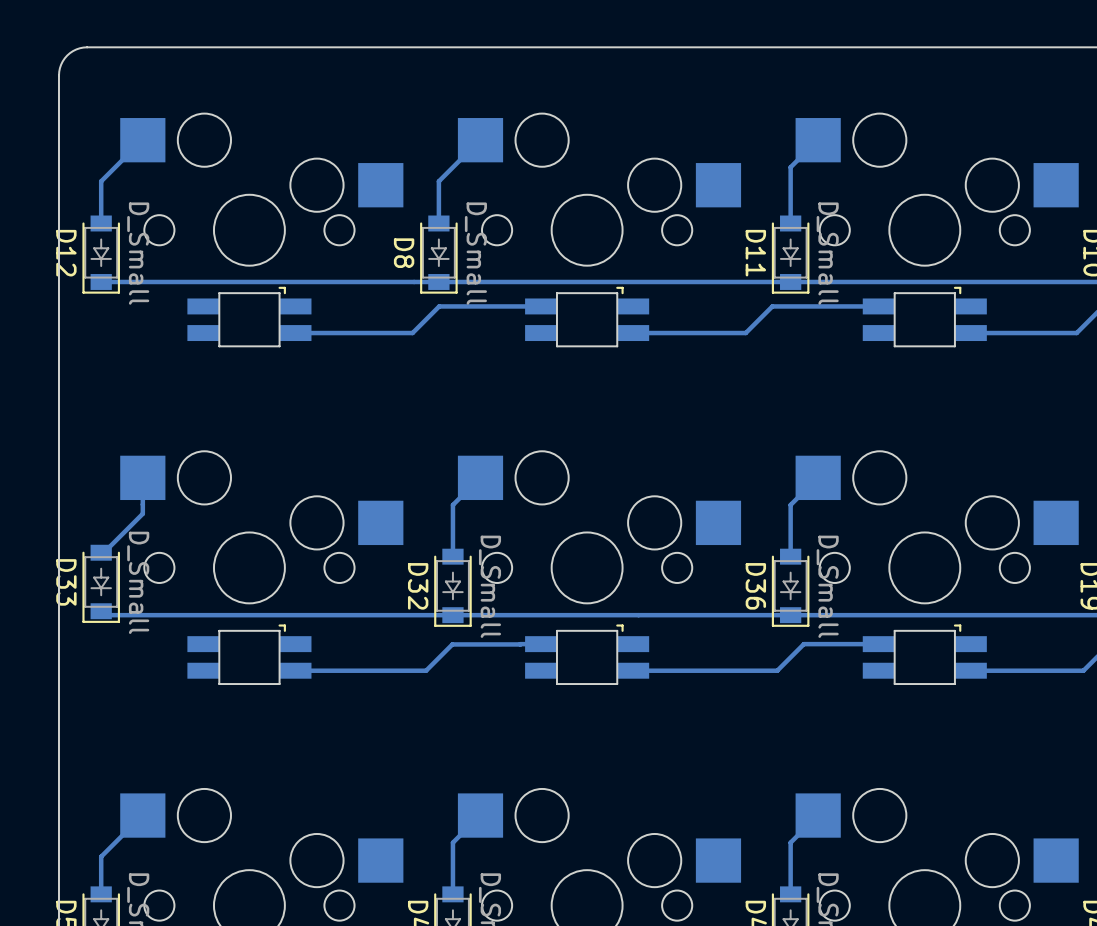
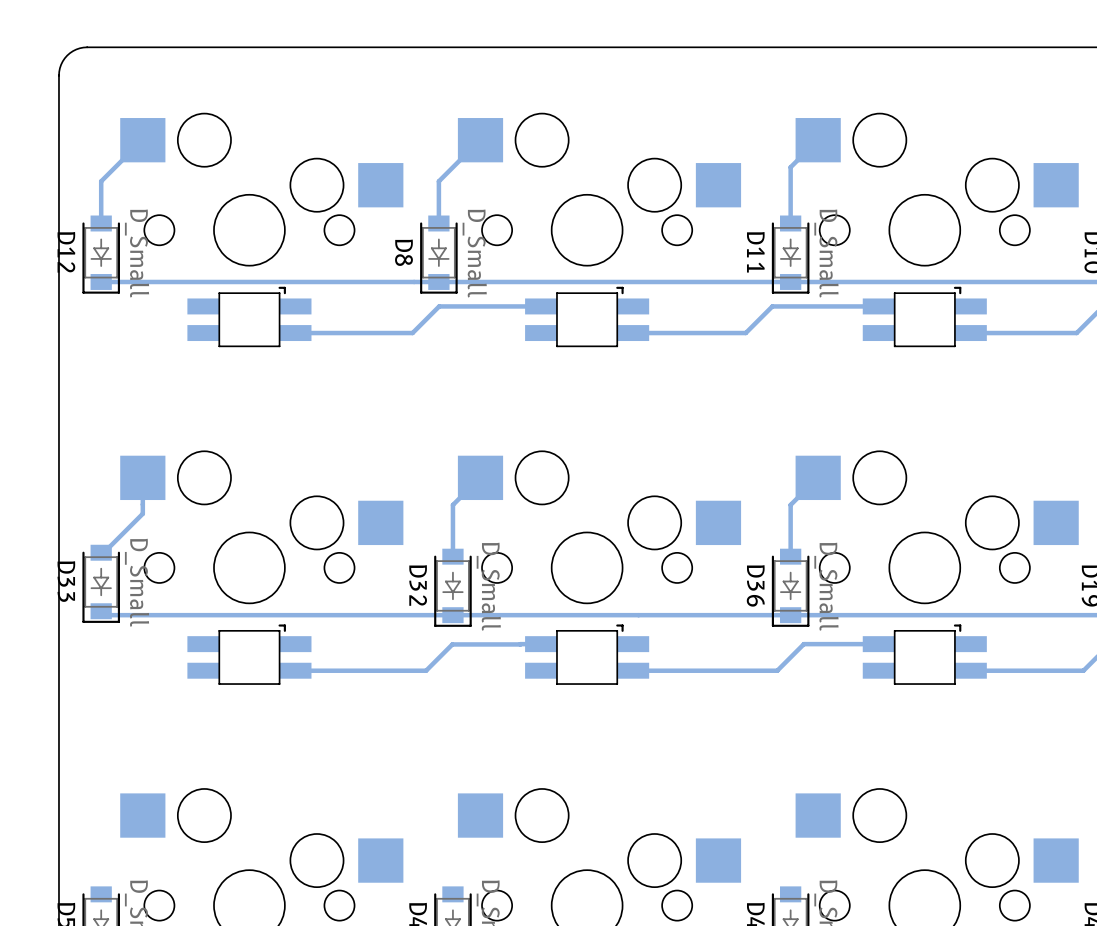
track: (142, 815) (101, 856) (101, 894) -> none
track: (480, 815) (452, 842) (452, 894) -> none
track: (818, 815) (790, 842) (790, 894) -> none

